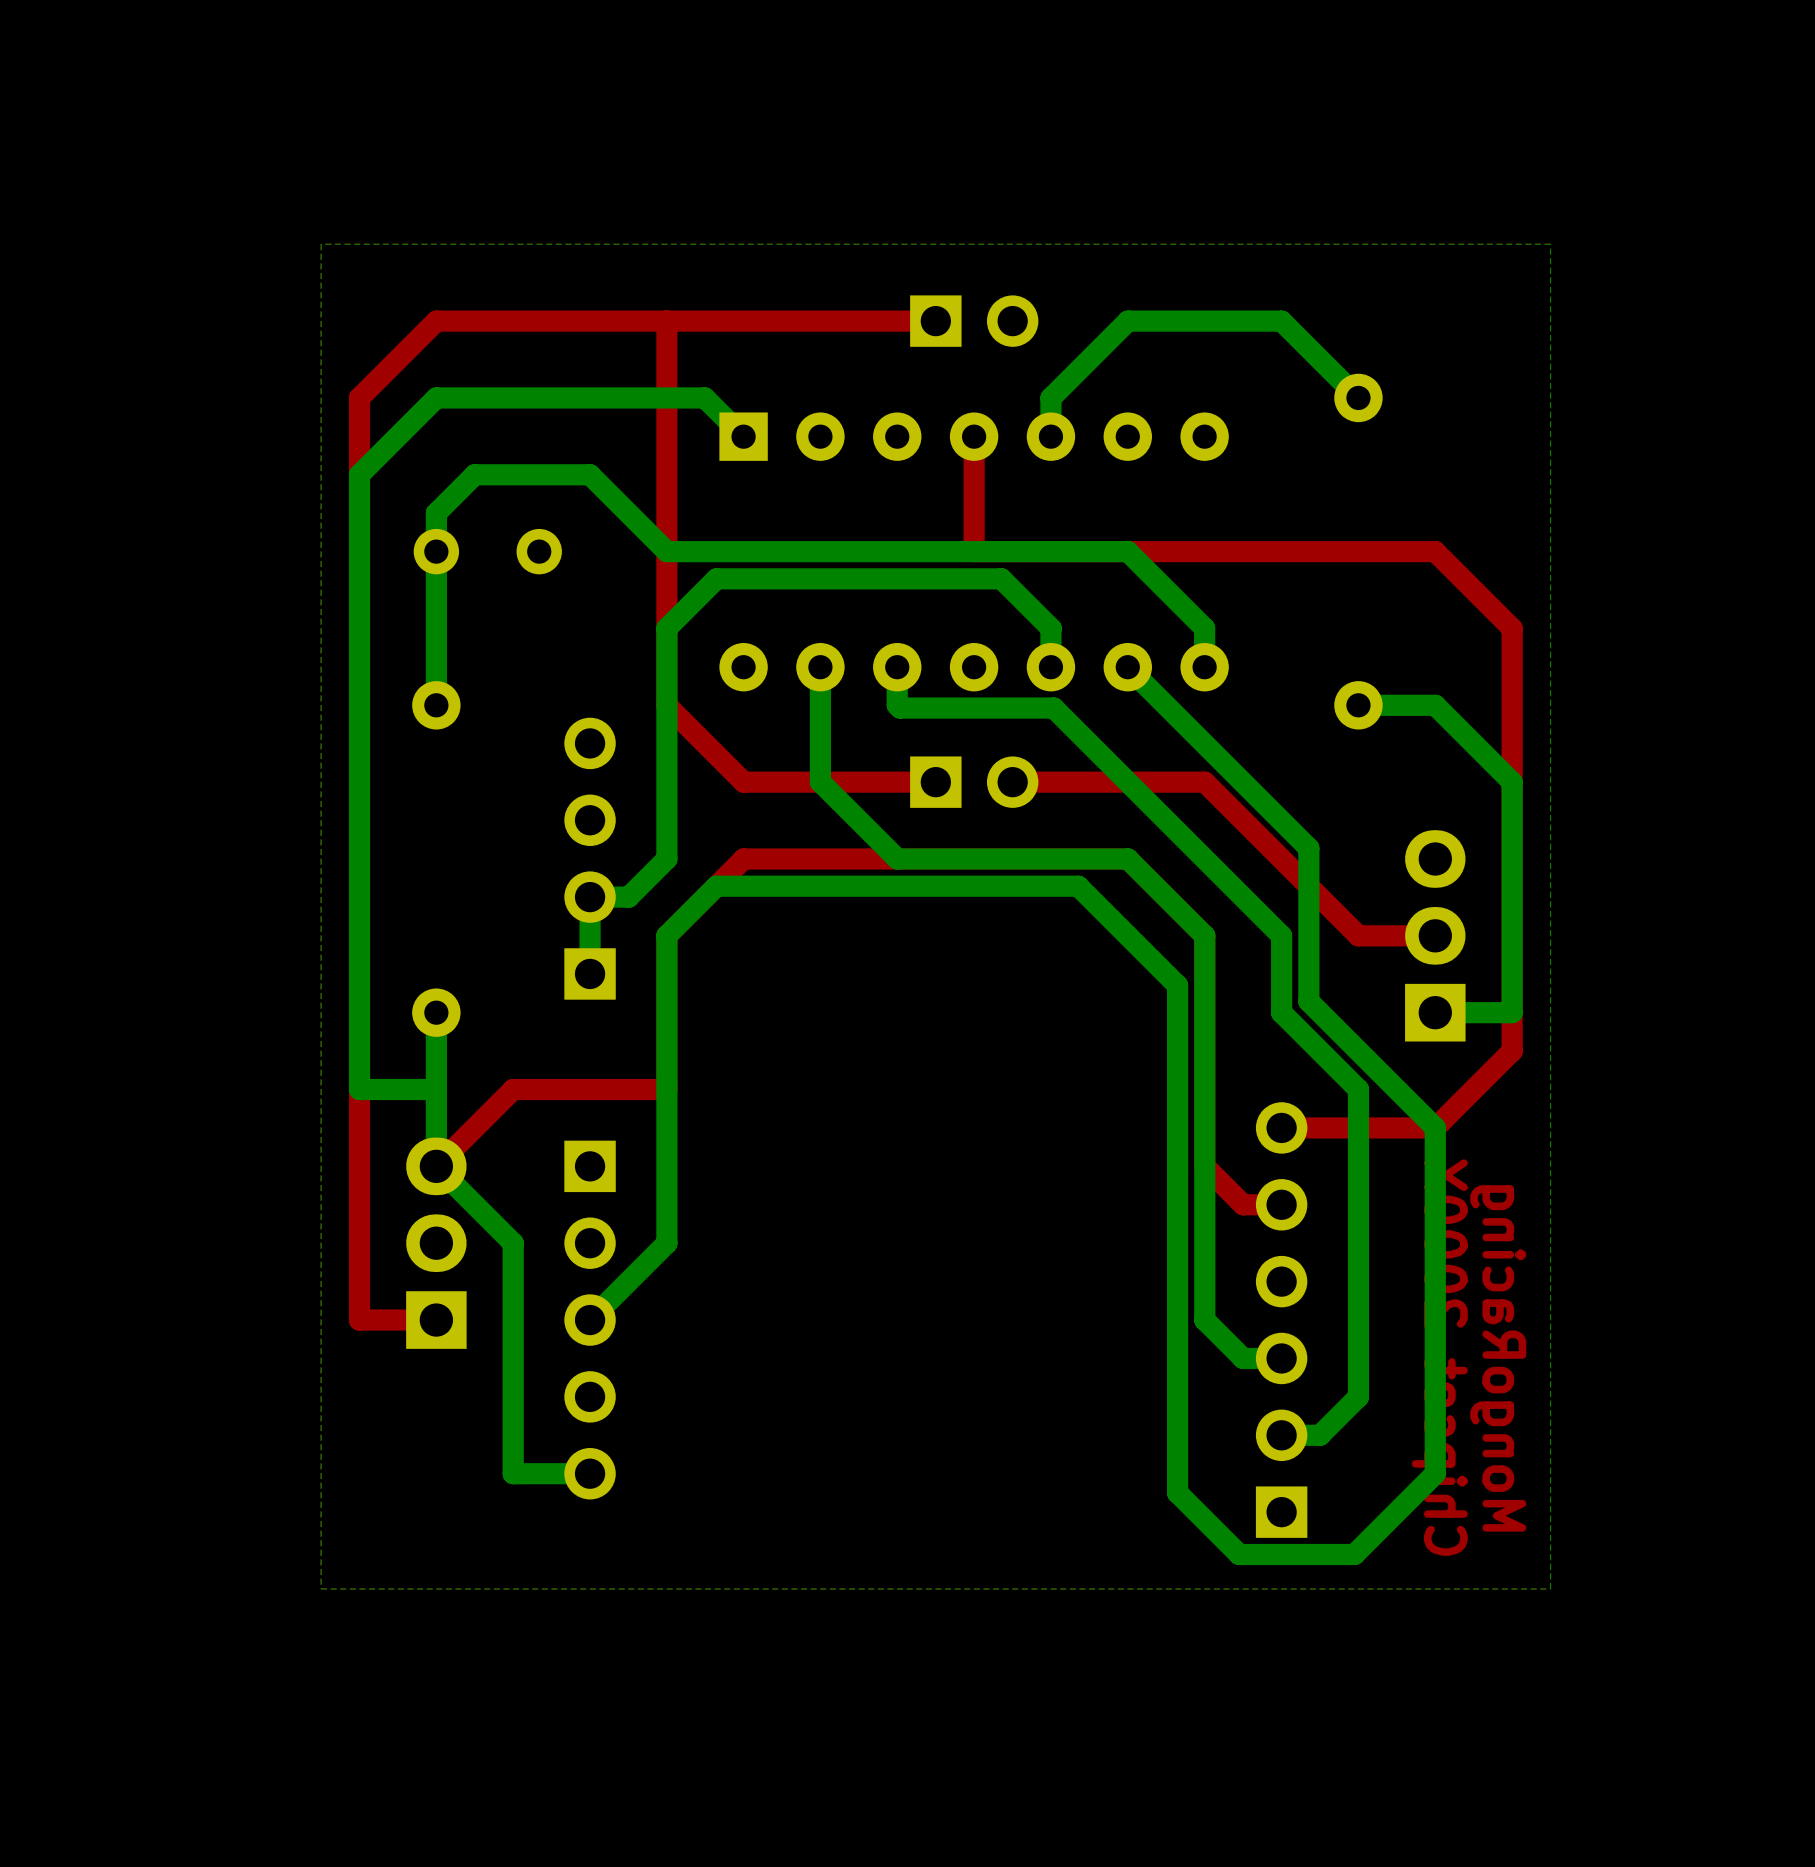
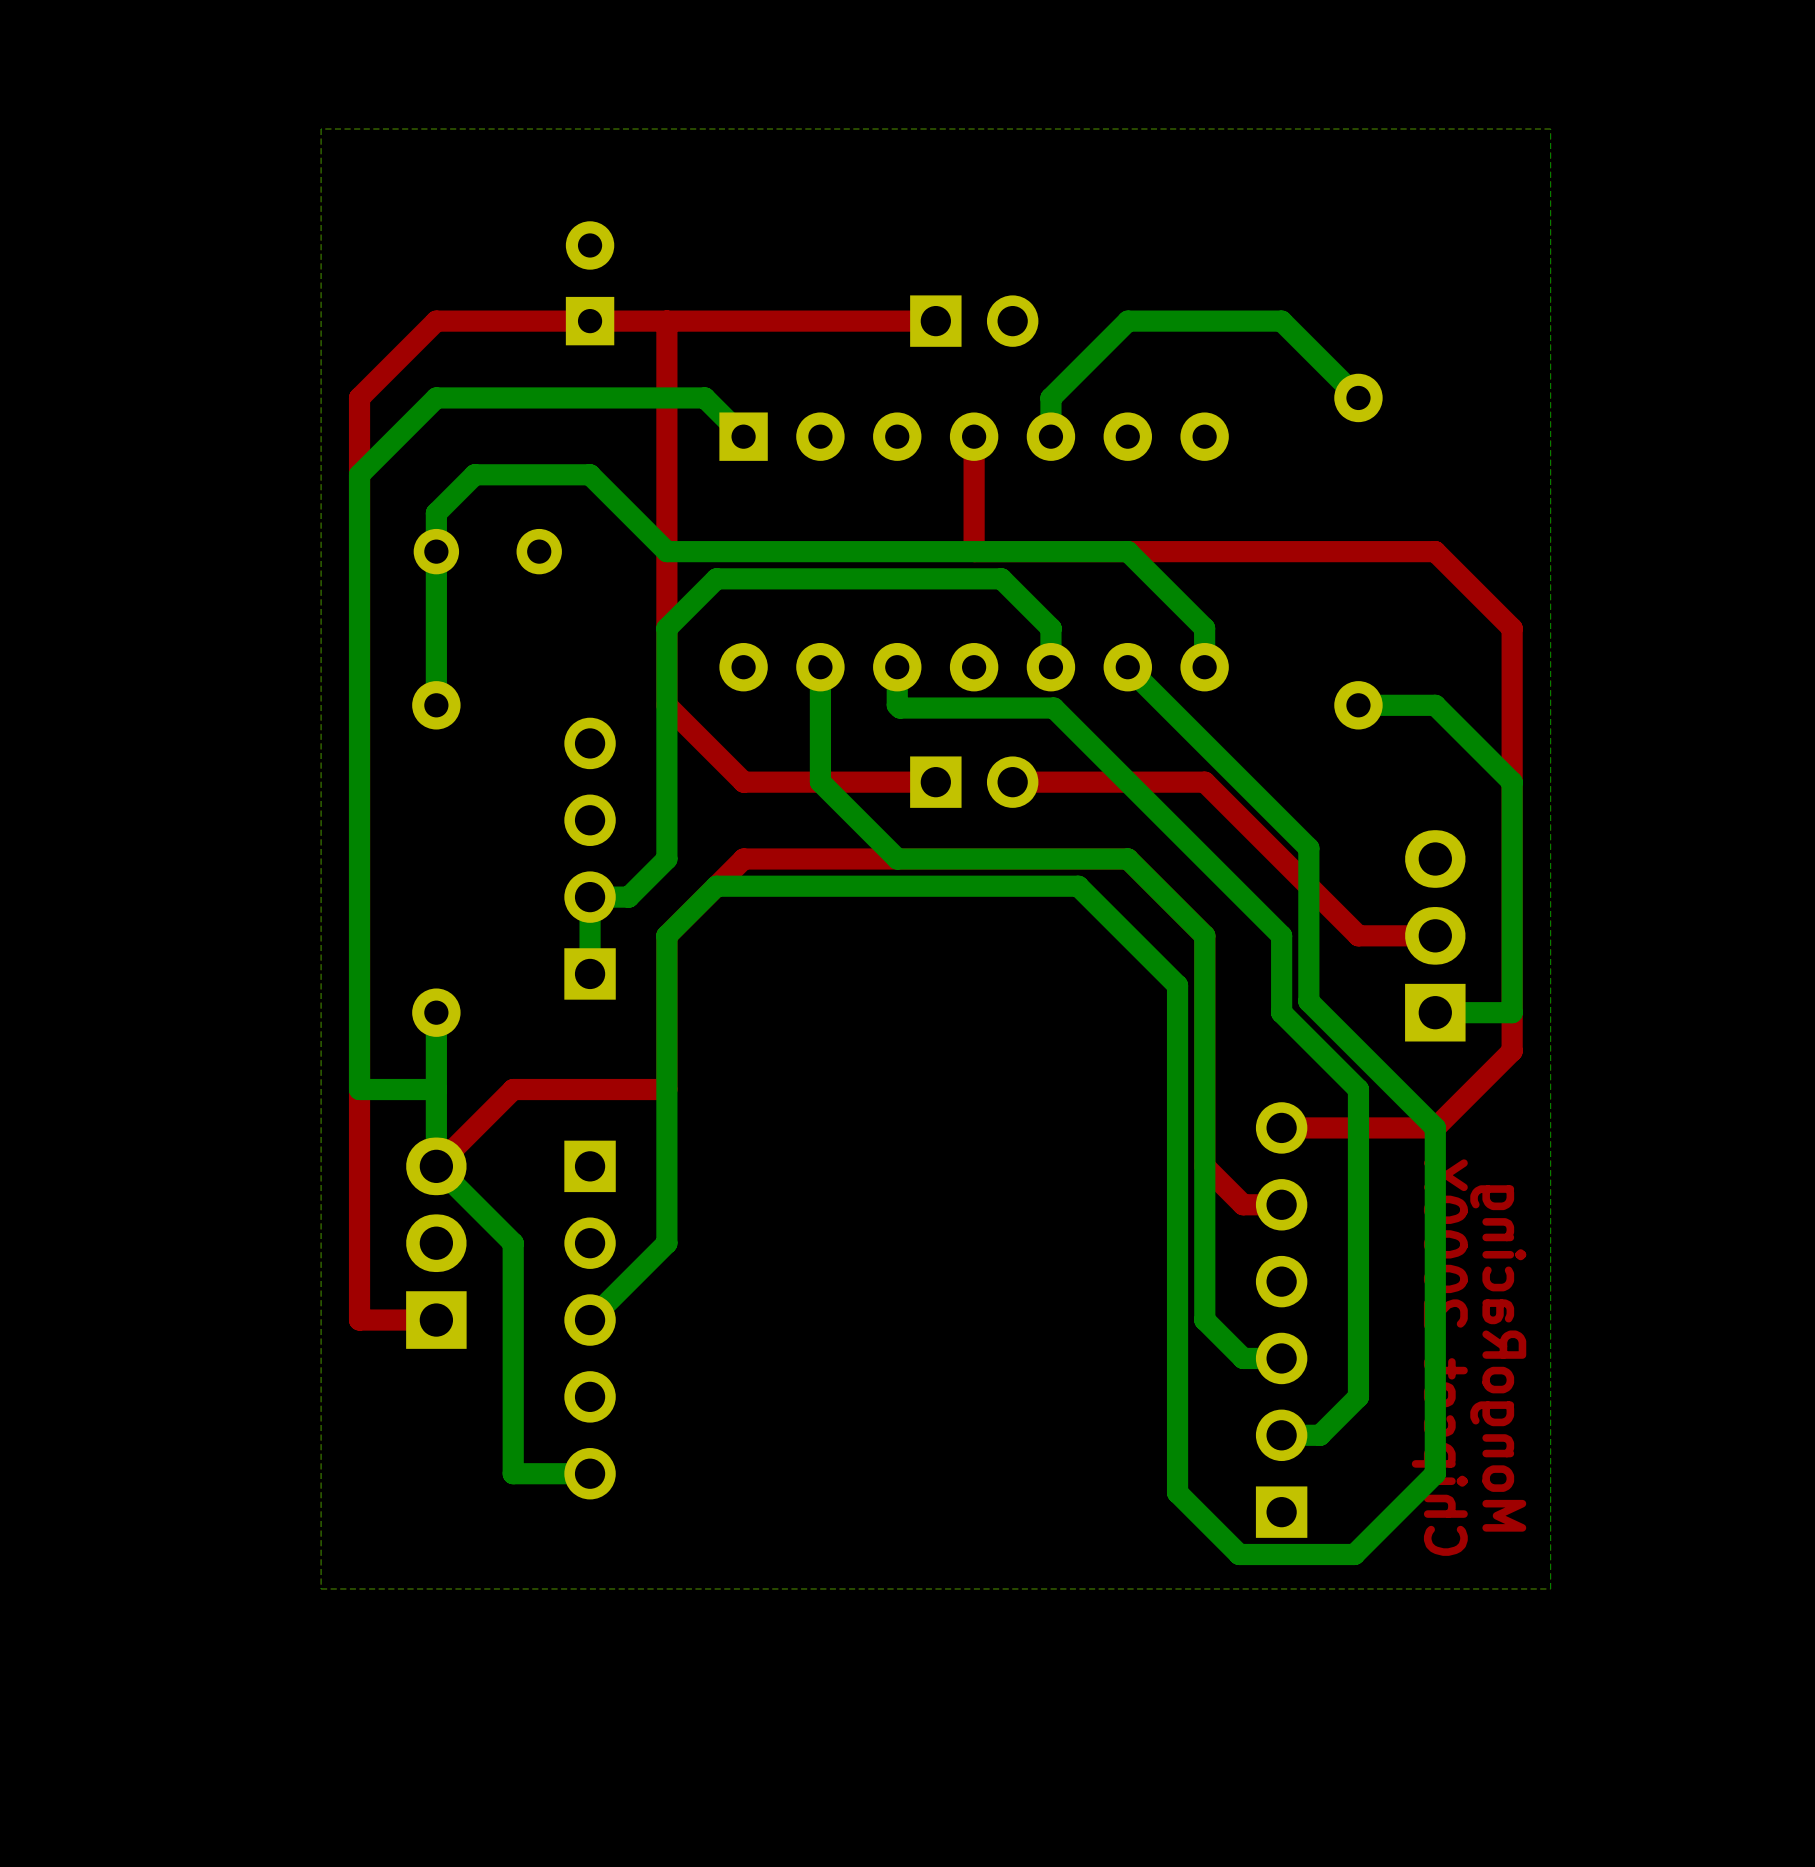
bottom zone outline: (1550, 244) (321, 244) -> (1550, 244) (1550, 129) (321, 129) (321, 244)
part: none -> (590, 283)

